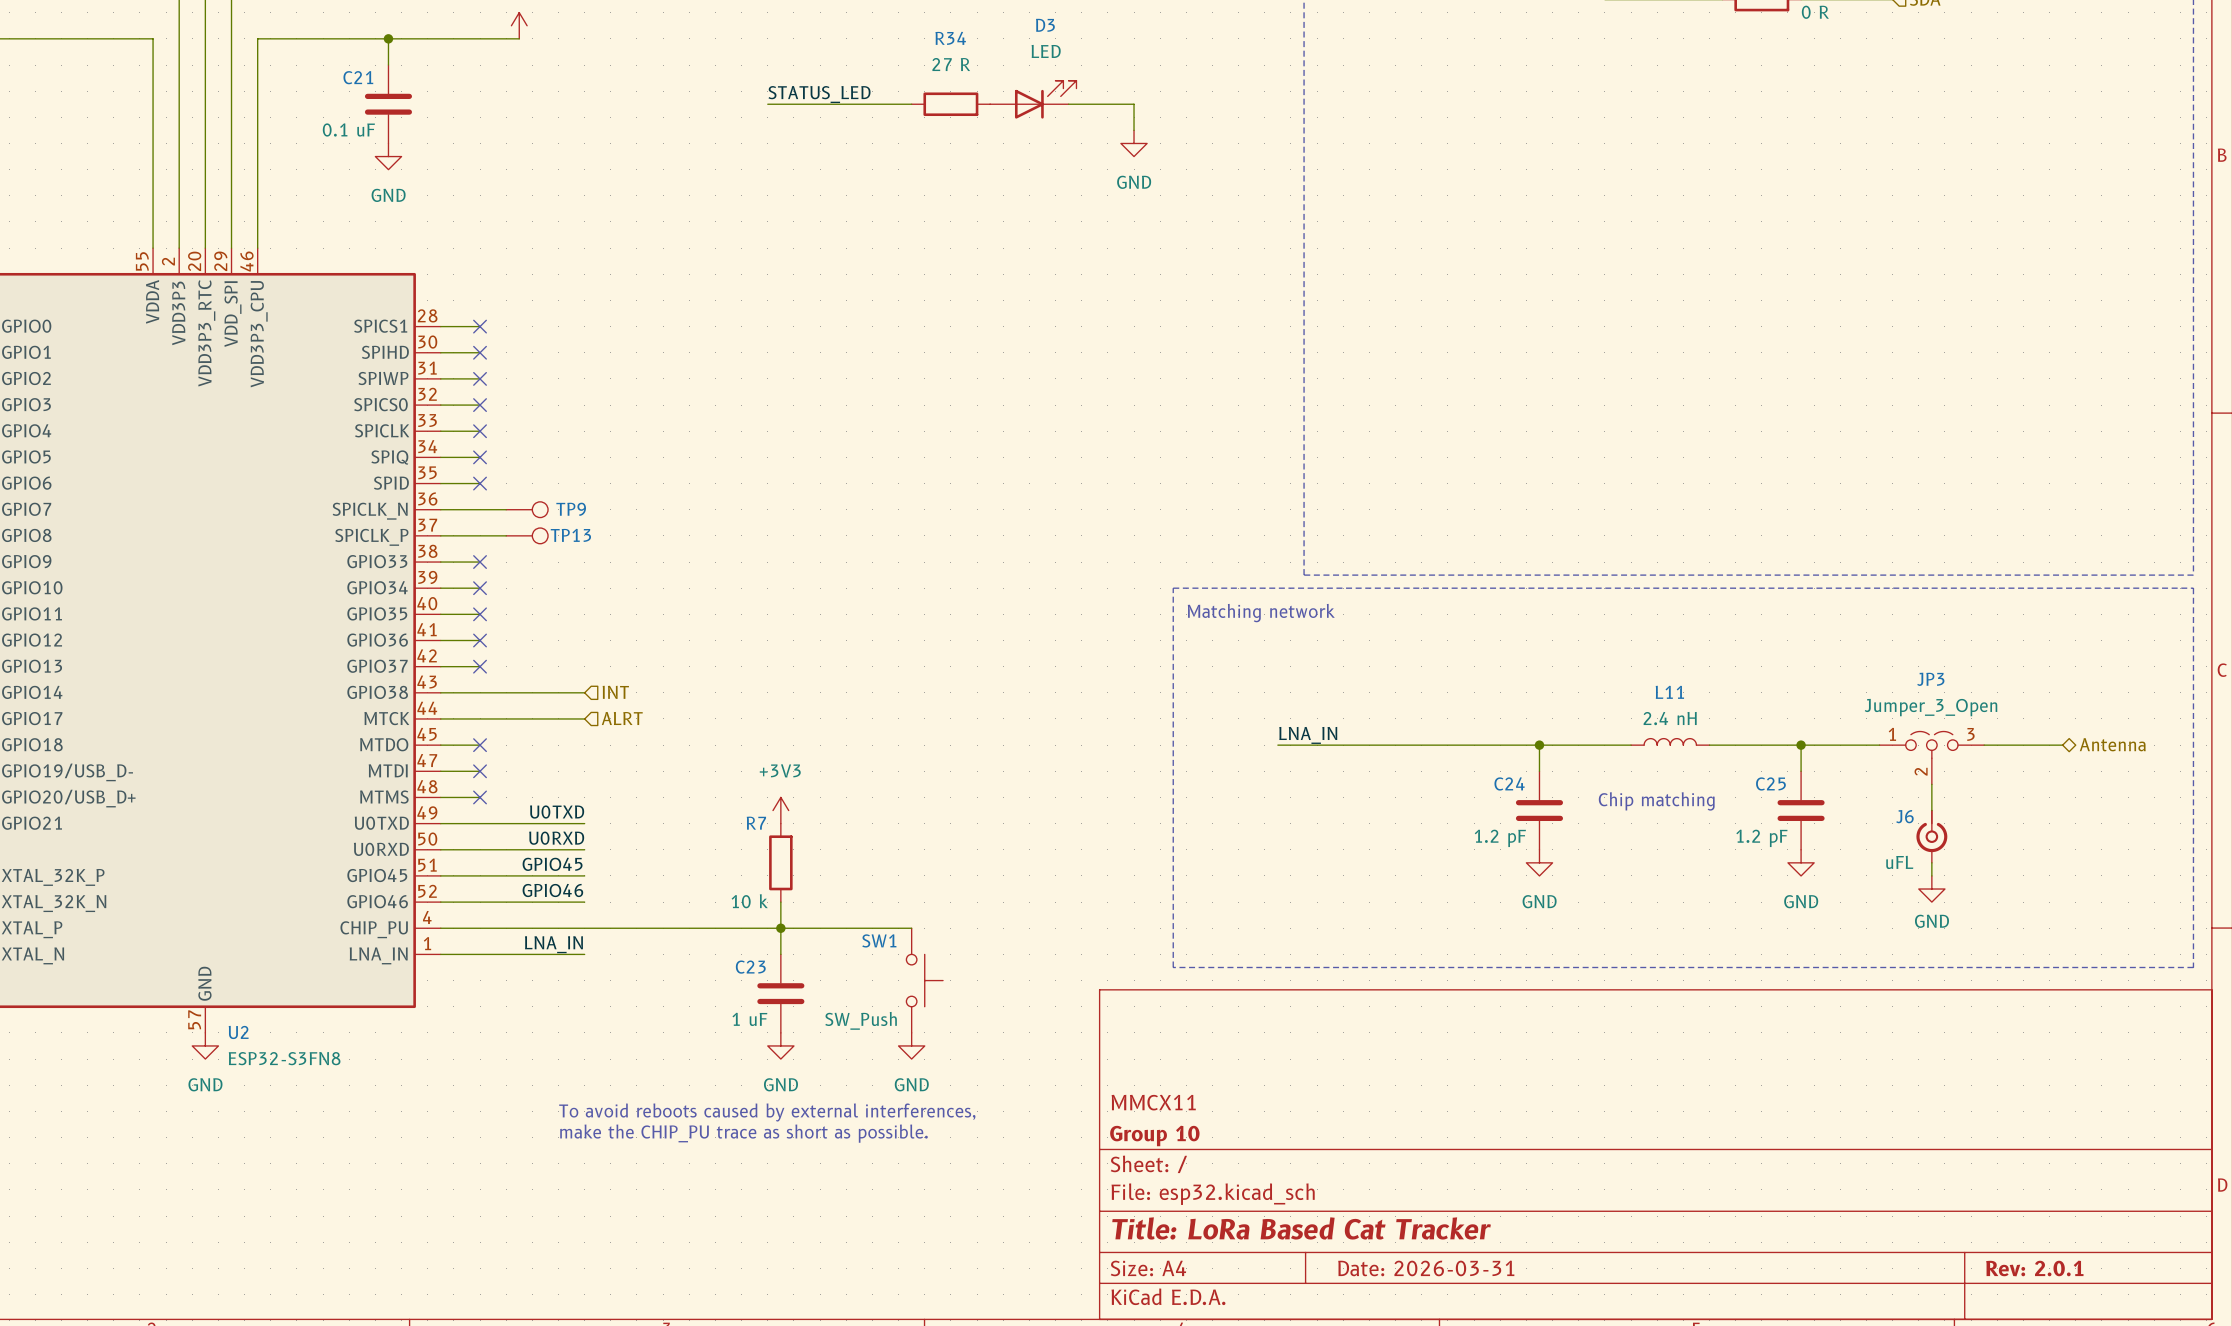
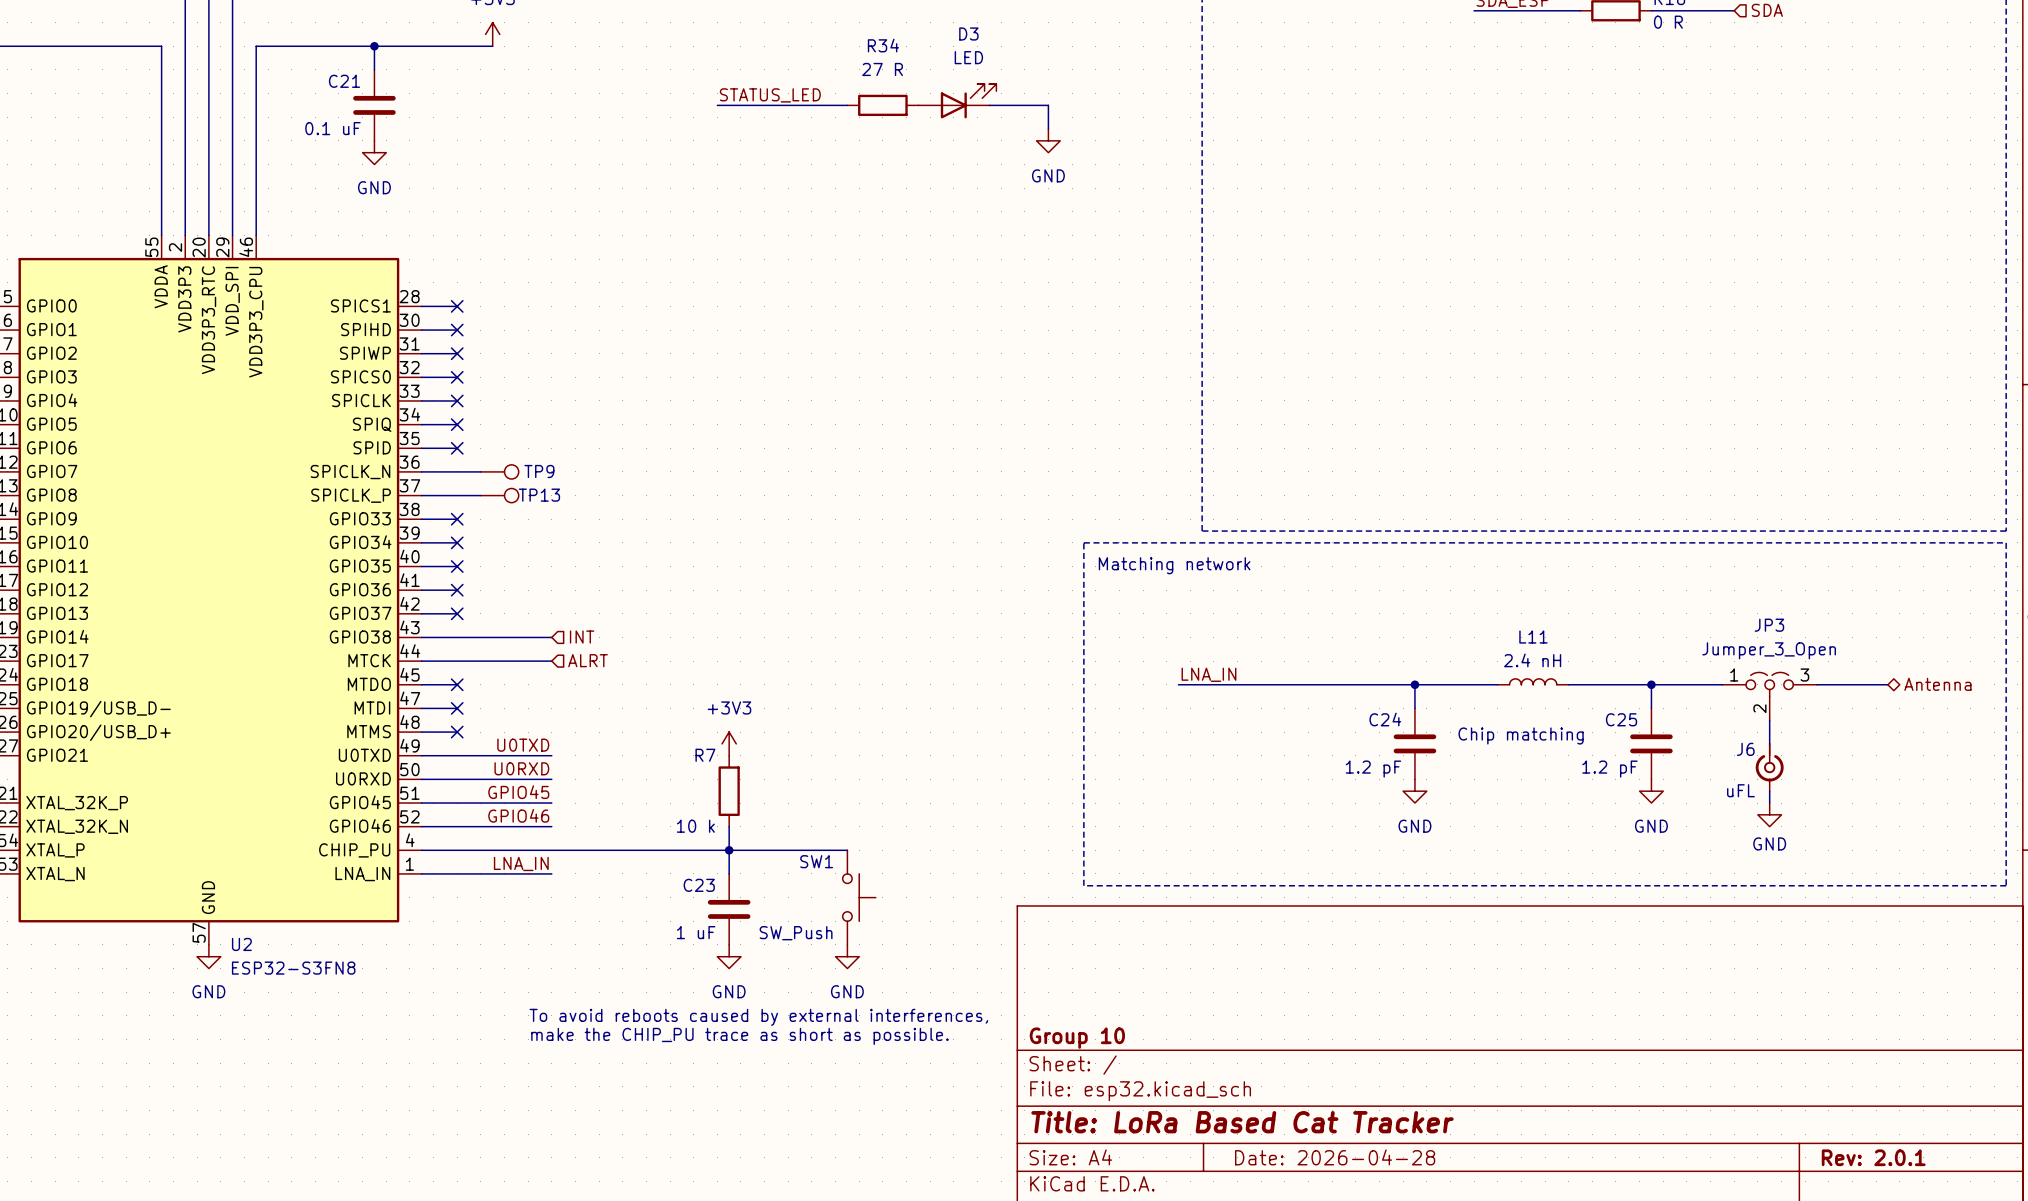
title block: MMCX11 (1153, 1102) -> none
title block: Date: 2026-03-31 (1426, 1268) -> Date: 2026-04-28 (1335, 1157)

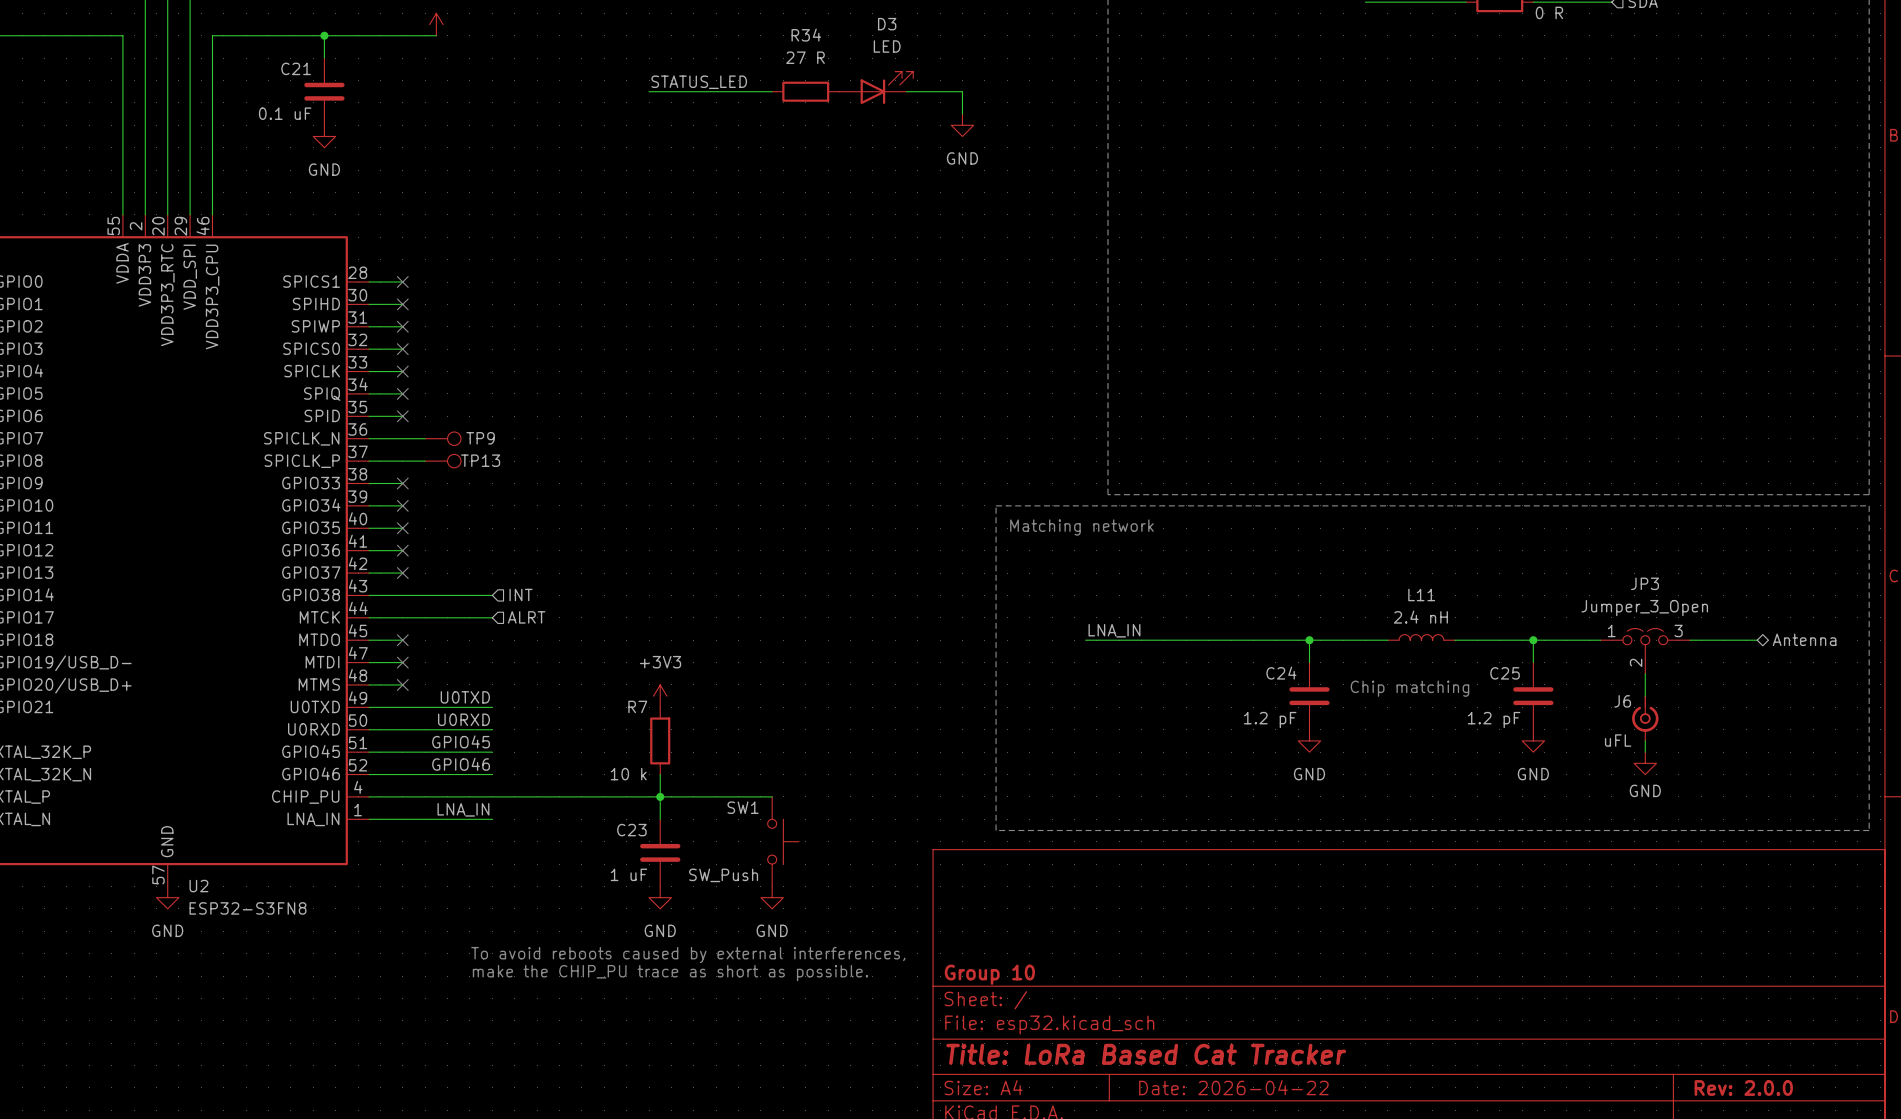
title block: Date: 2026-04-28 (1335, 1157) -> Date: 2026-04-22 (1233, 1087)
title block: Rev: 2.0.1 (1873, 1157) -> Rev: 2.0.0 (1743, 1087)

